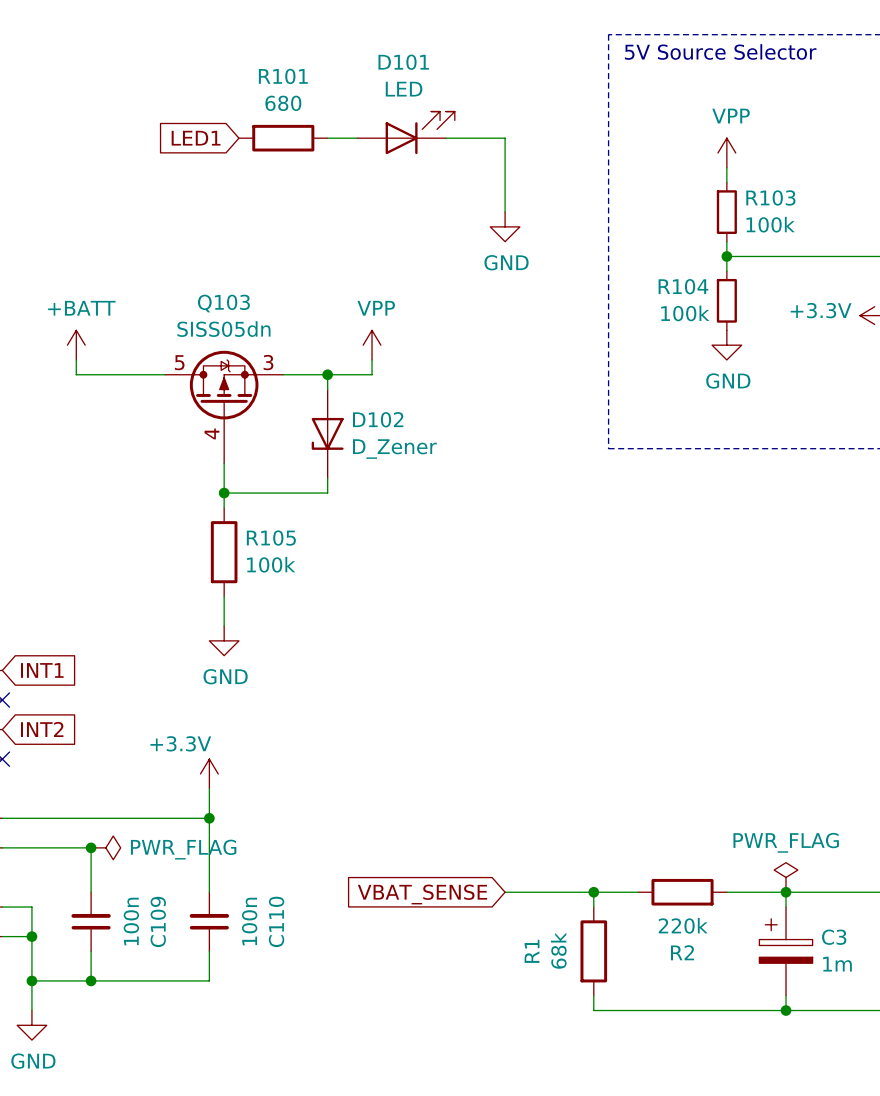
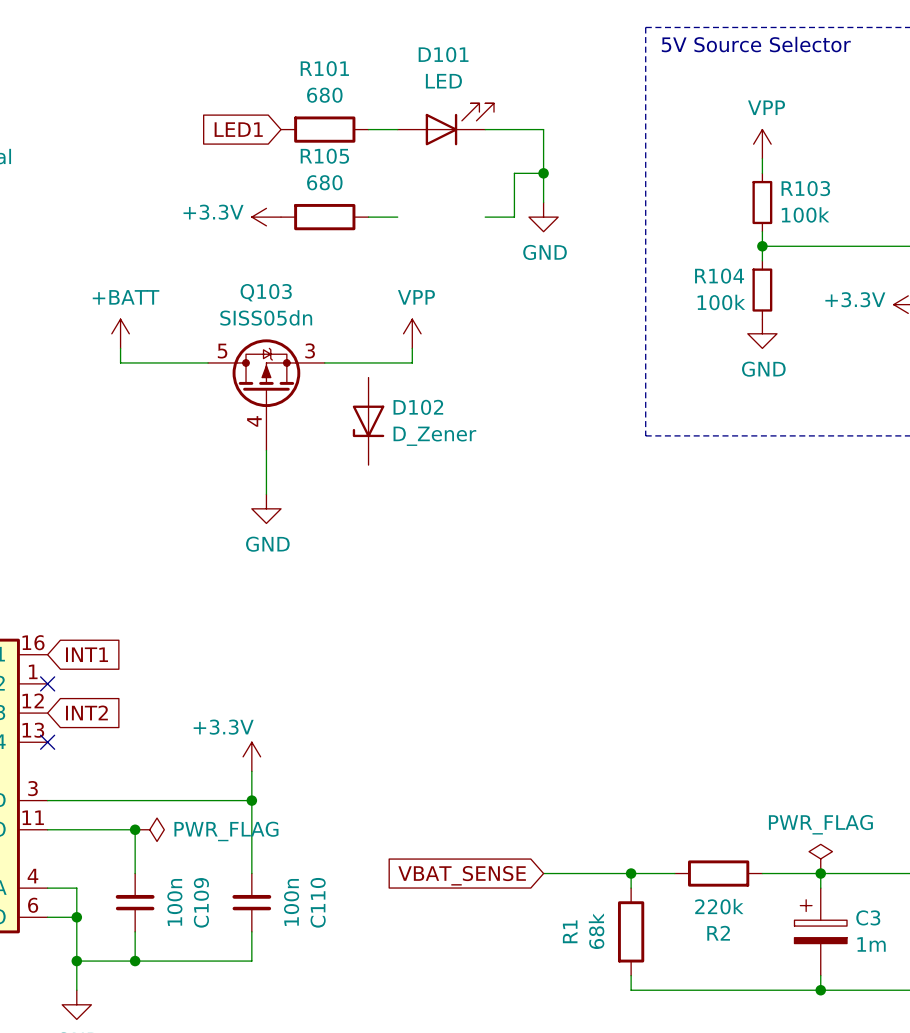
wire: none -> (543, 173) (514, 173) (514, 217) (485, 217)
junction: none -> (543, 173)
power symbol: none -> +3.3V (266, 217)
wire: none -> (368, 217) (397, 217)
wire: (327, 374) (327, 389) -> none
junction: (327, 374) -> none
wire: (327, 478) (327, 493) (224, 493) -> none
junction: (224, 493) -> none
R105 name position: R105 (271, 538) -> R105 (324, 156)
R105 rotation: 0° (224, 552) -> 90° clockwise (324, 217)
R105 position: (224, 552) -> (324, 217)
R105 value: 100k (271, 564) -> 680 (324, 182)
wire: (224, 596) (224, 626) -> none
power symbol position: GND (224, 640) -> GND (266, 508)

